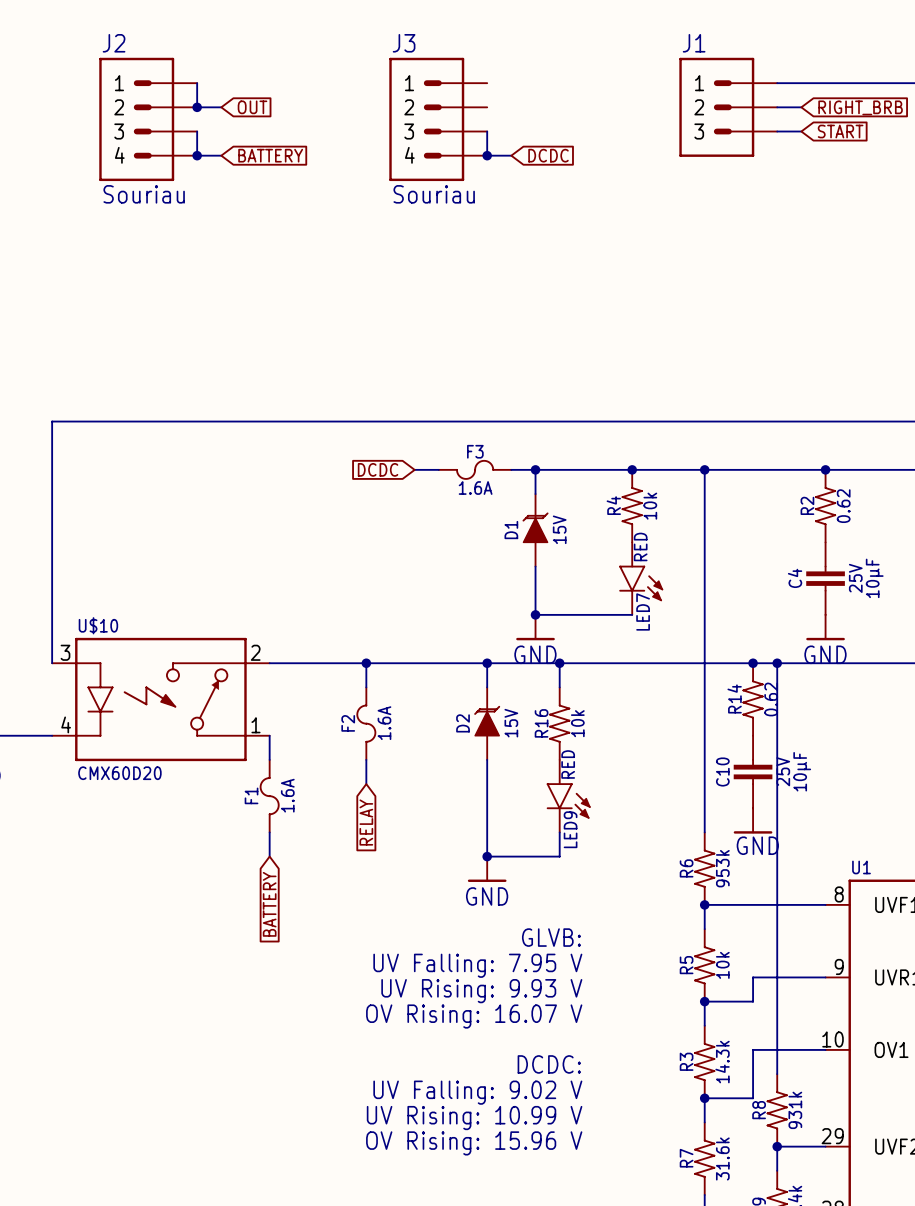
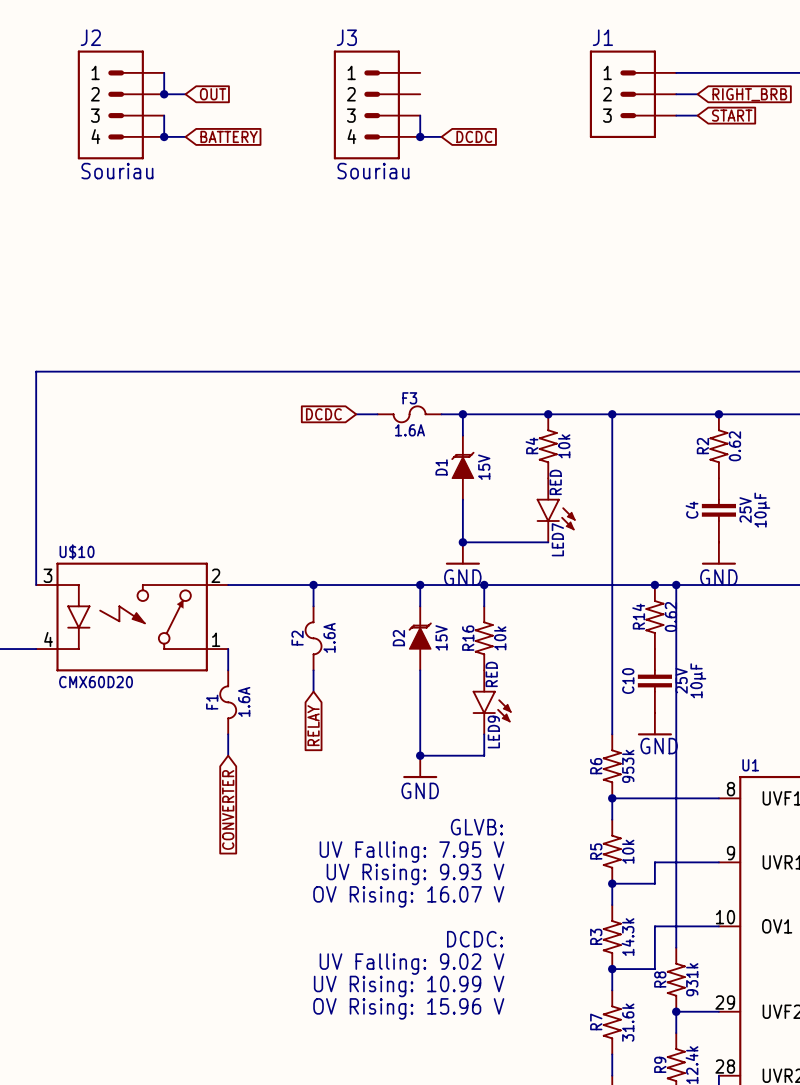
global label: BATTERY (269, 904) -> CONVERTER (228, 809)

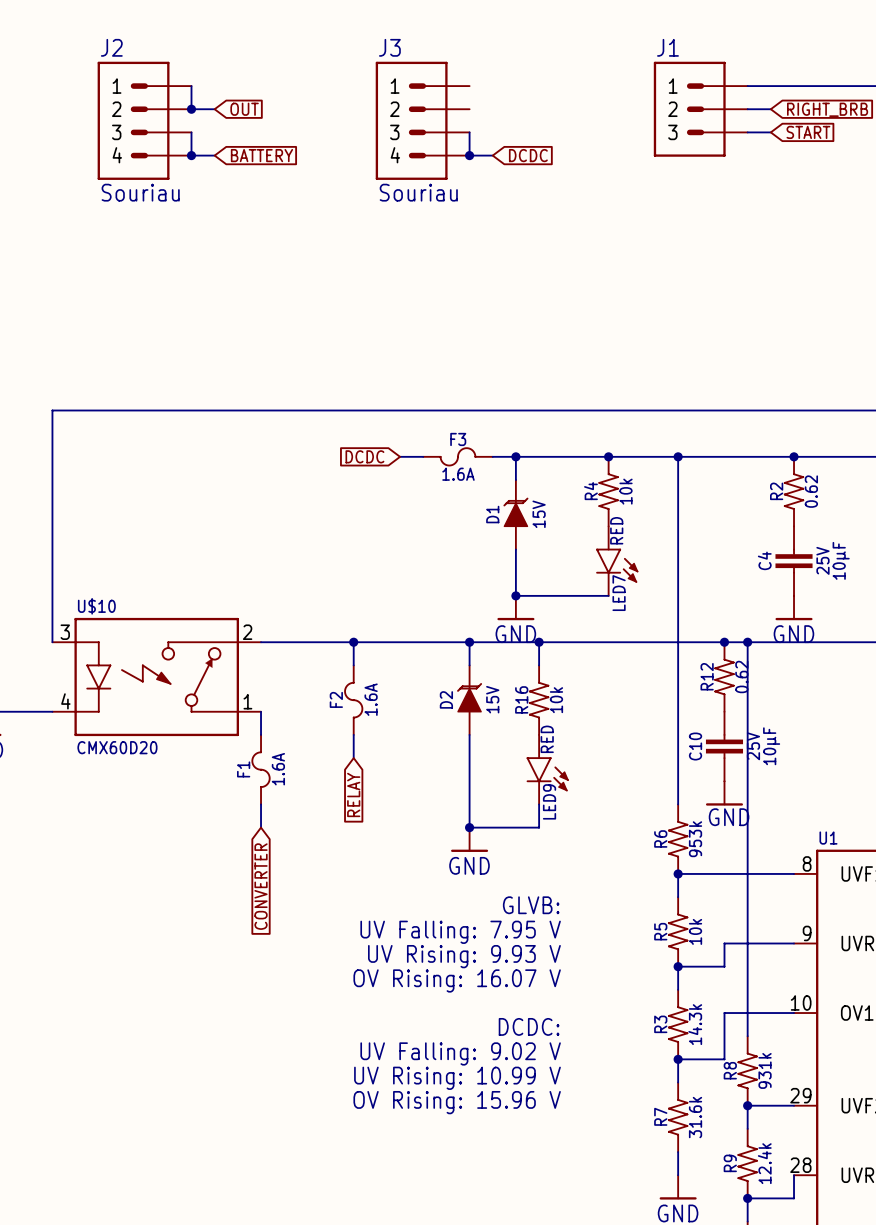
R14 name: R14 (638, 616) -> R12 (707, 676)

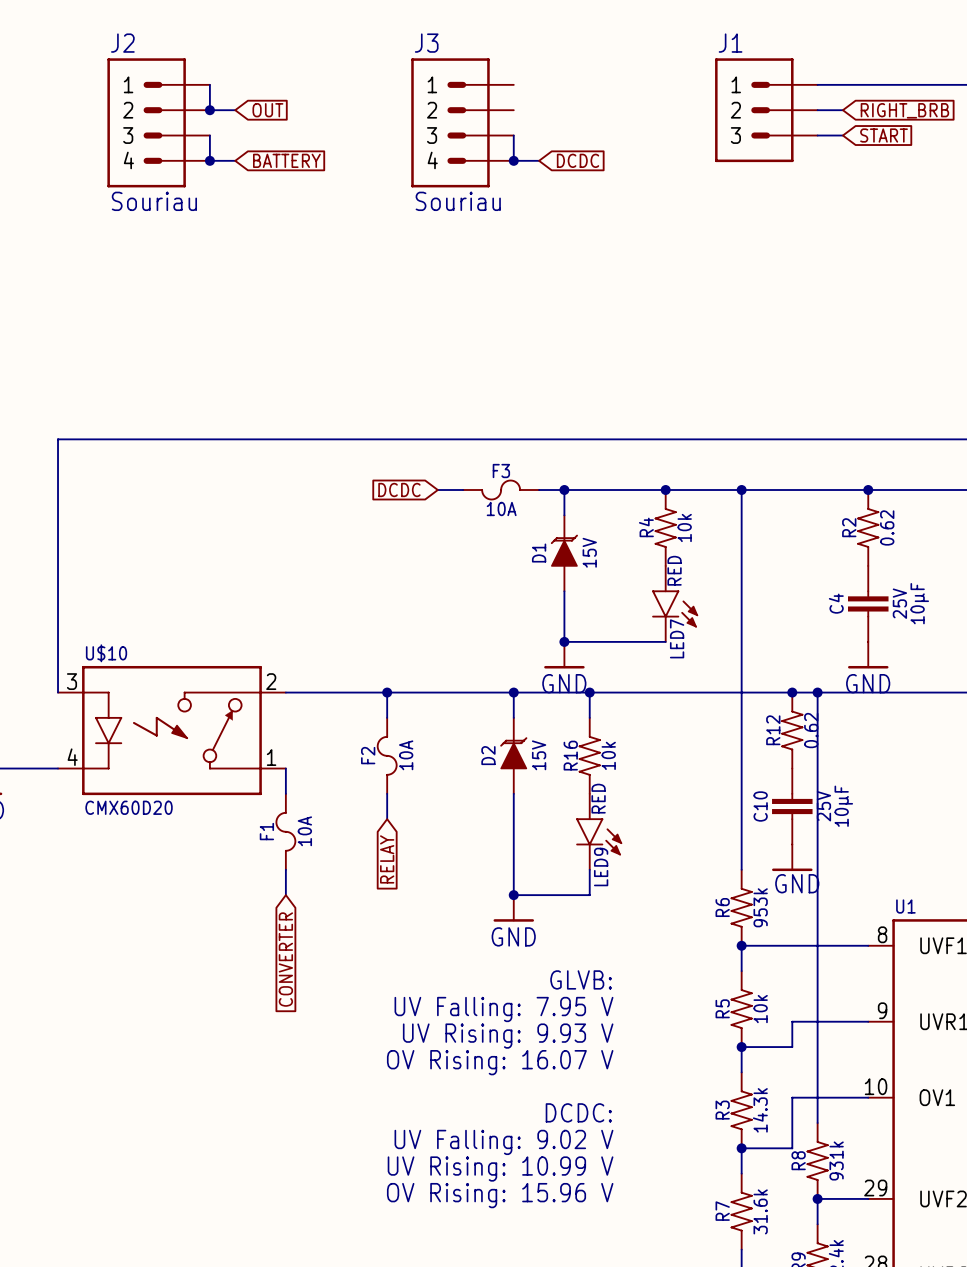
F3 text: 1.6A (458, 474) -> 10A (501, 508)
F2 text: 1.6A (371, 699) -> 10A (406, 755)
F1 text: 1.6A (278, 769) -> 10A (304, 831)

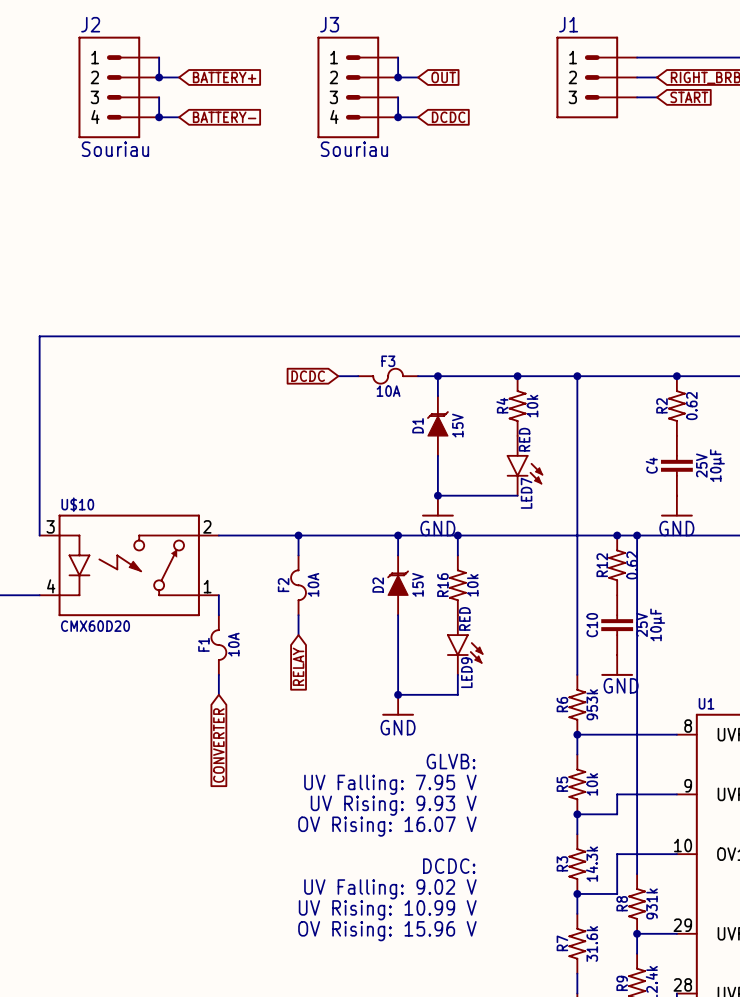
wire: none -> (398, 57) (398, 77) (418, 77)
global label: OUT (267, 110) -> BATTERY+ (224, 77)
junction: none -> (398, 77)
global label: none -> OUT (443, 77)
global label: BATTERY (286, 160) -> BATTERY- (224, 117)

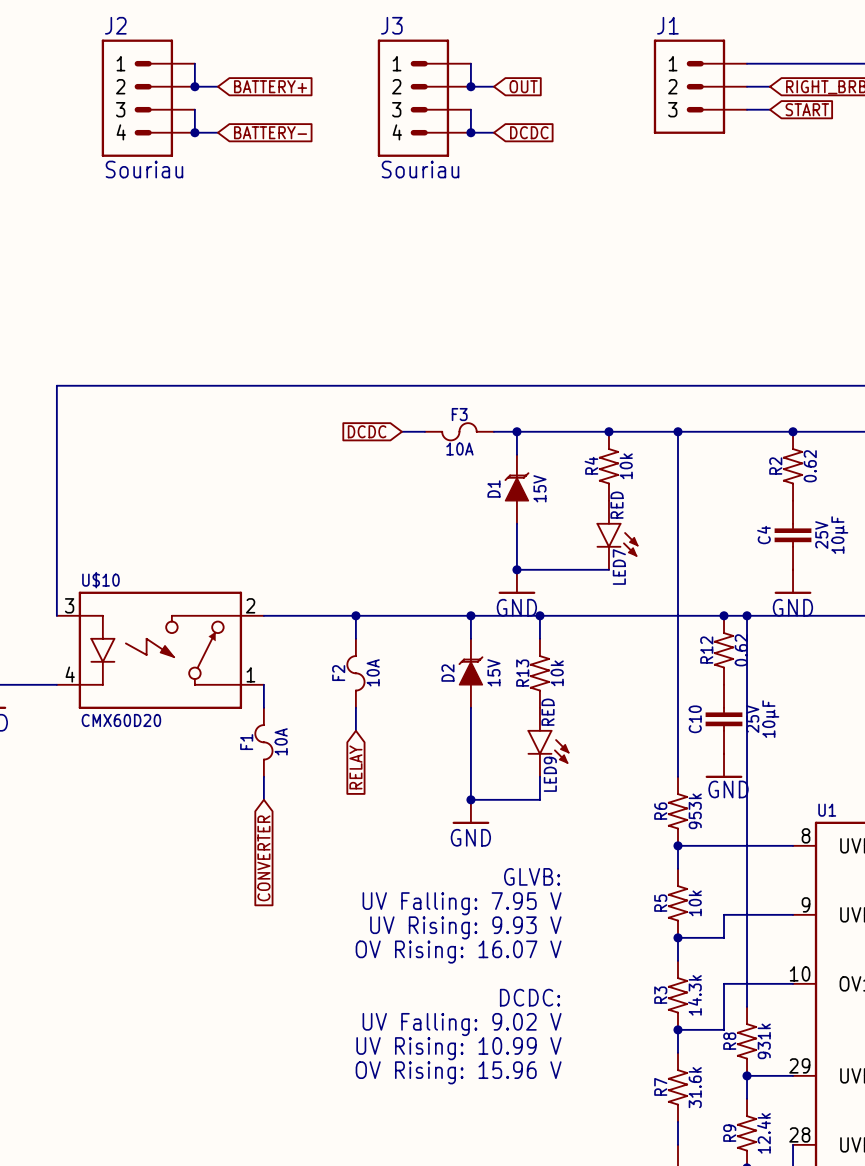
R16 name: R16 (442, 585) -> R13 (522, 673)

